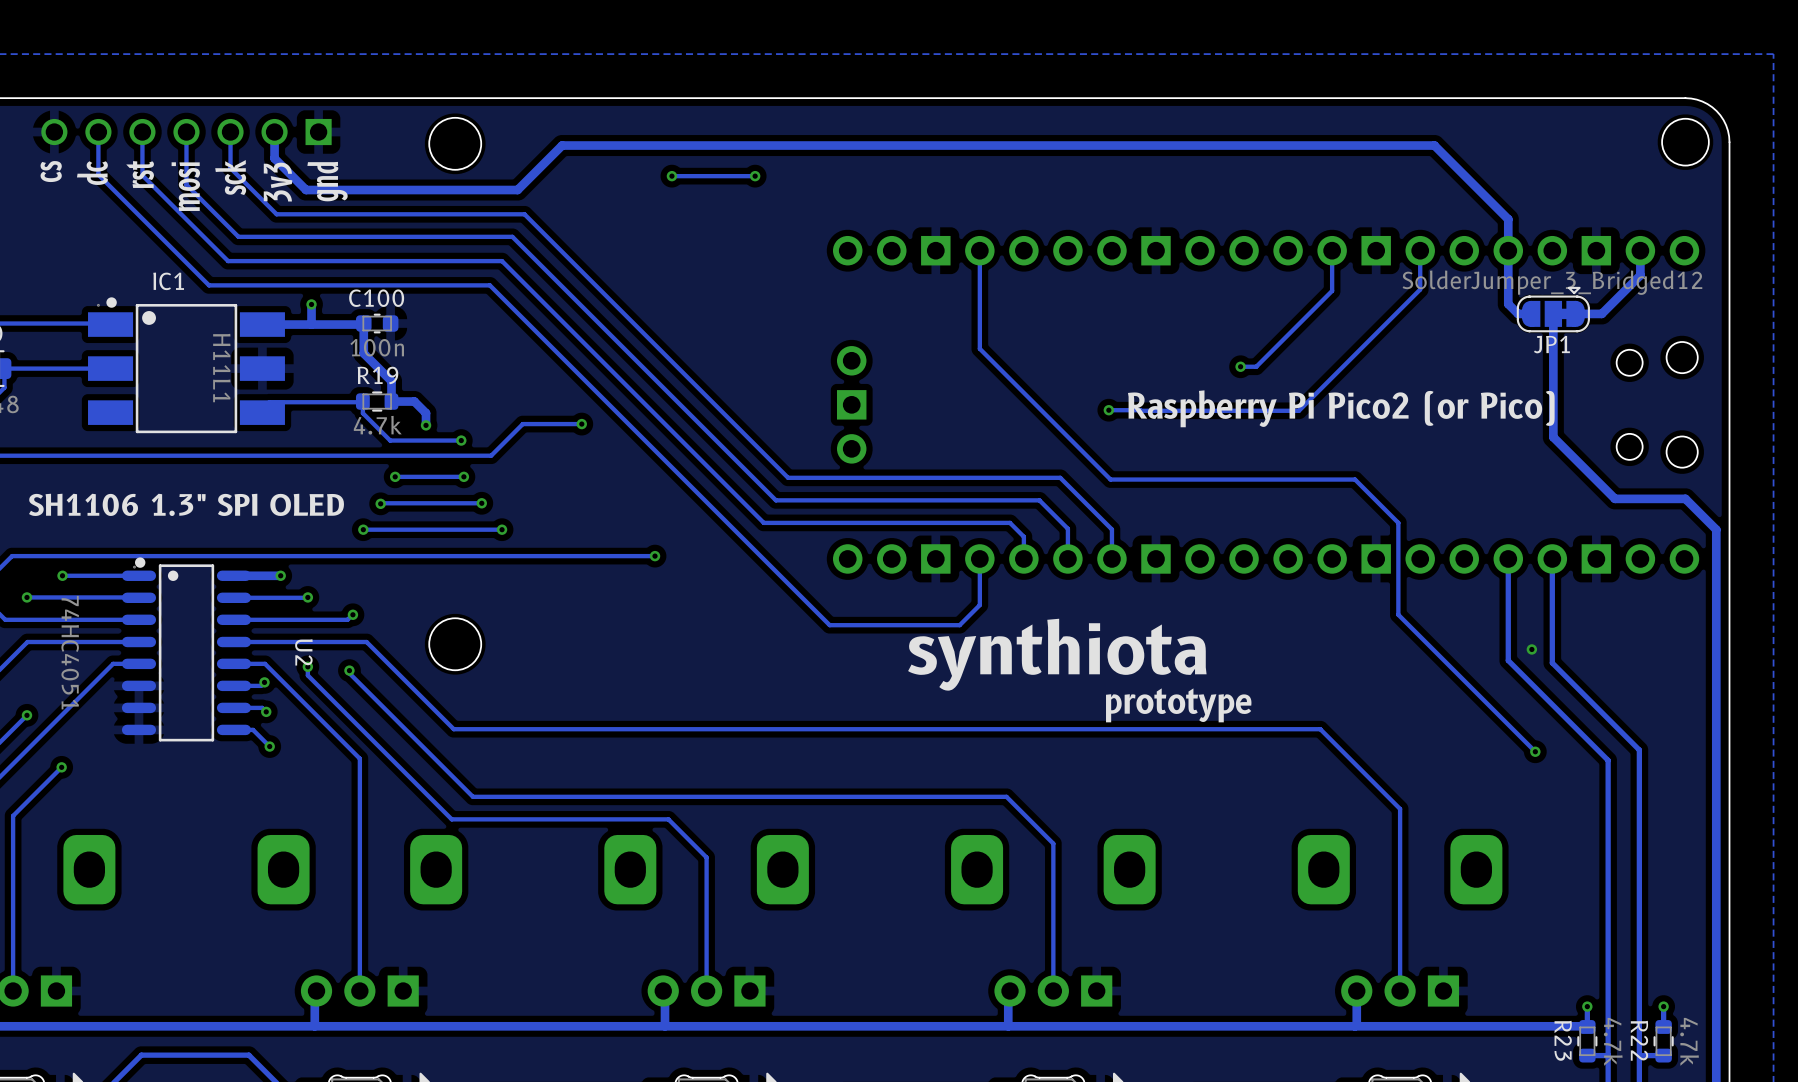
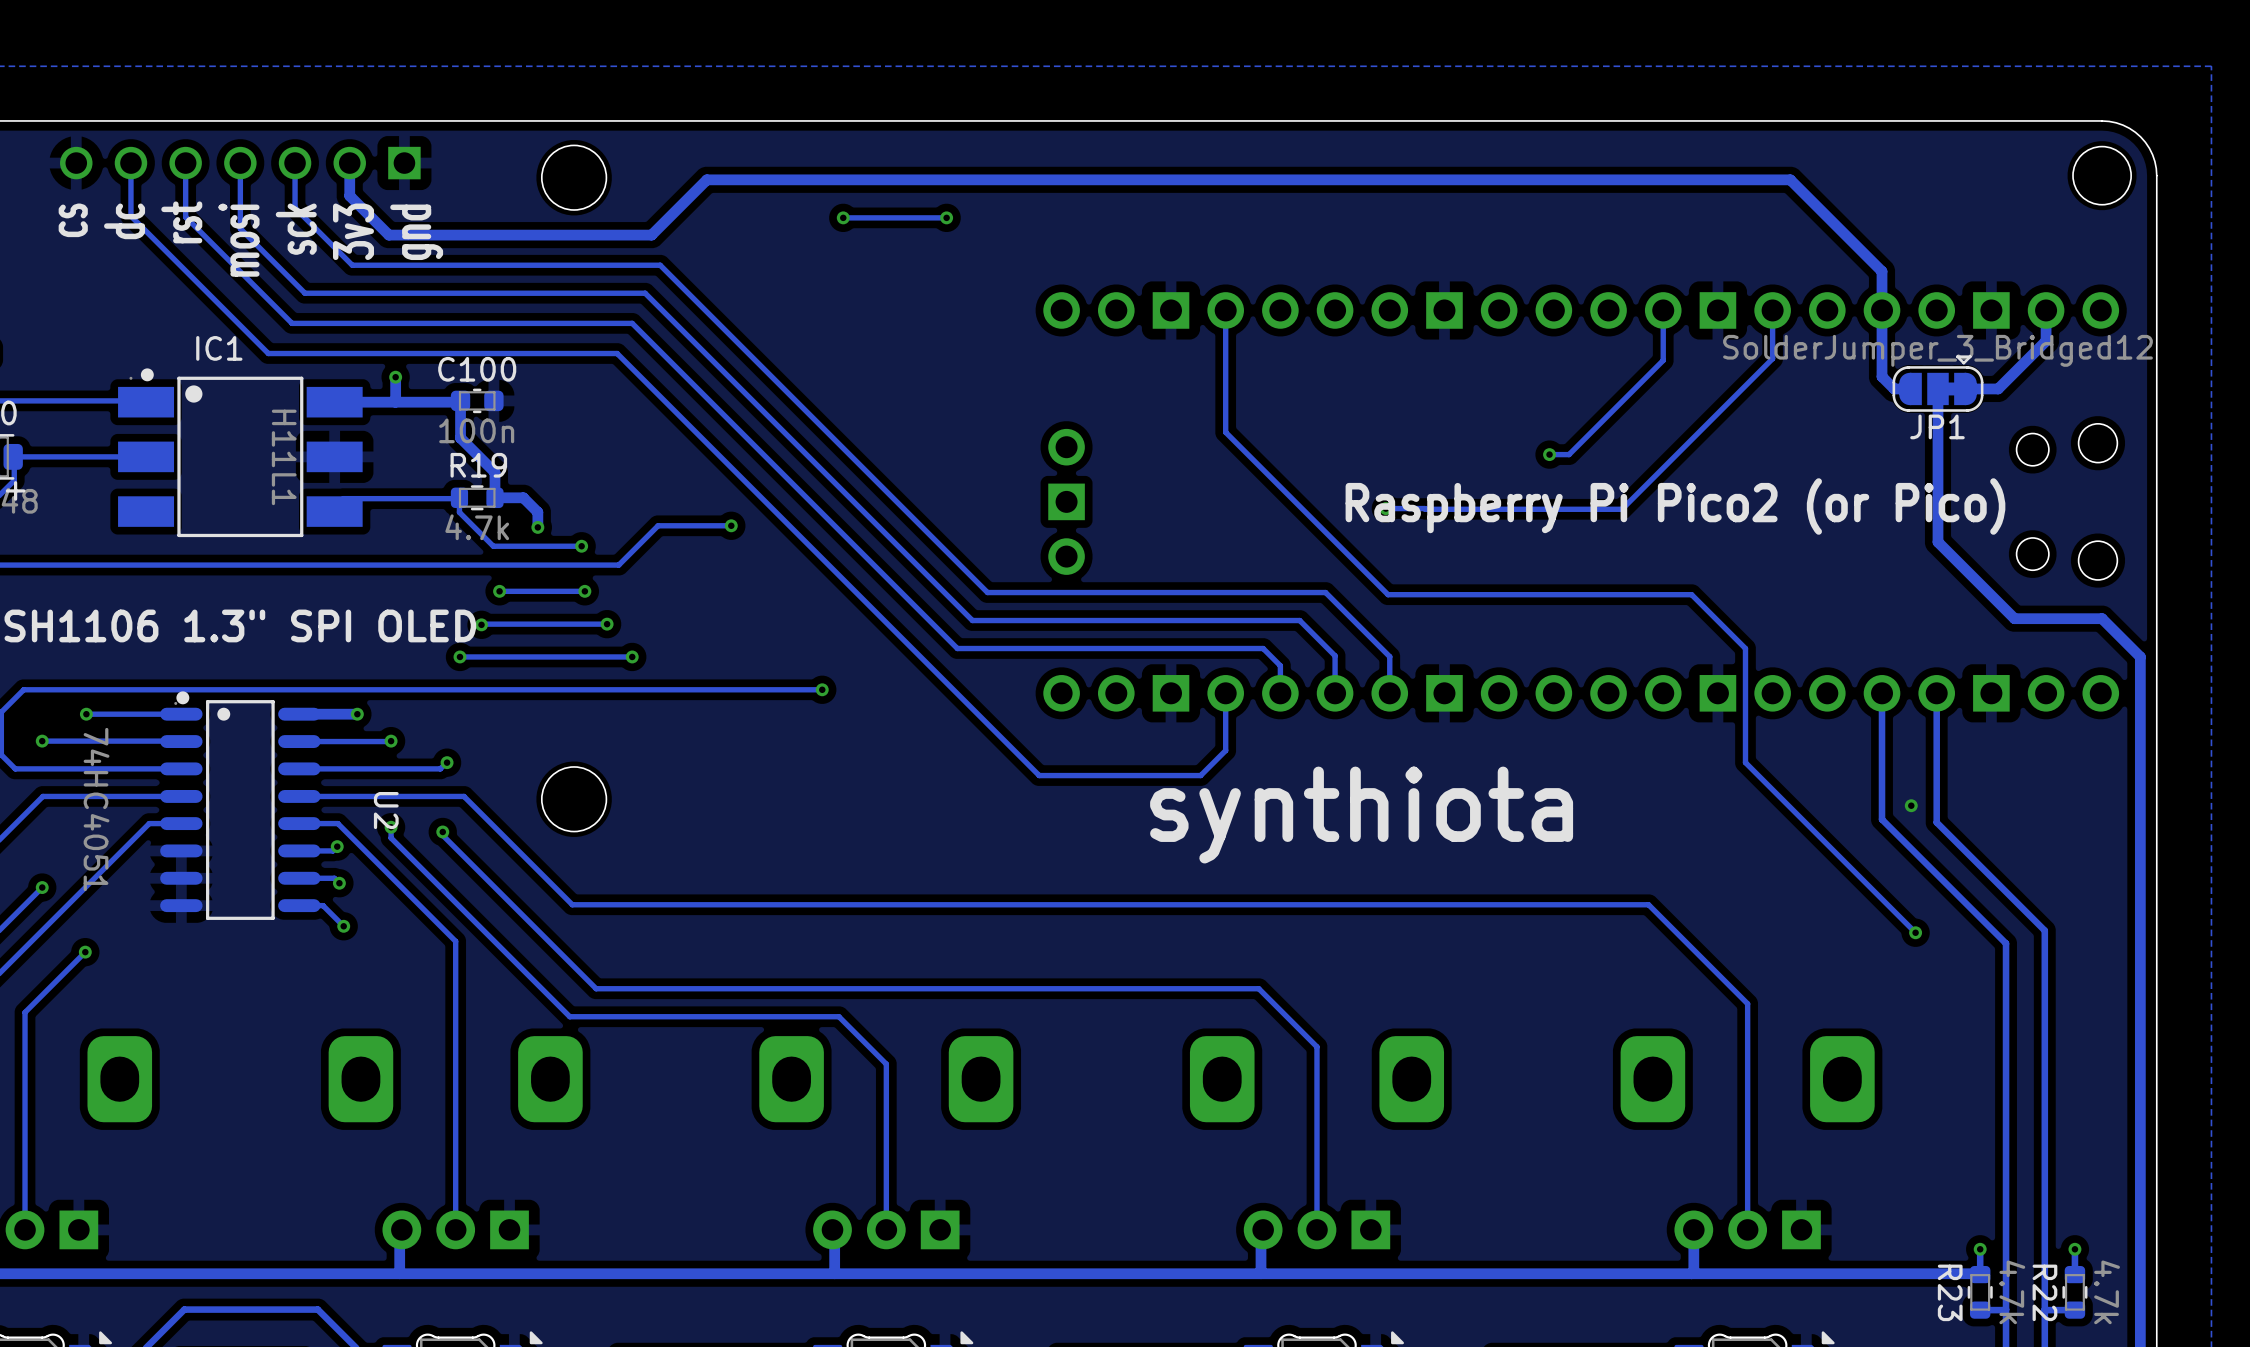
text: prototype (1178, 705) -> none

